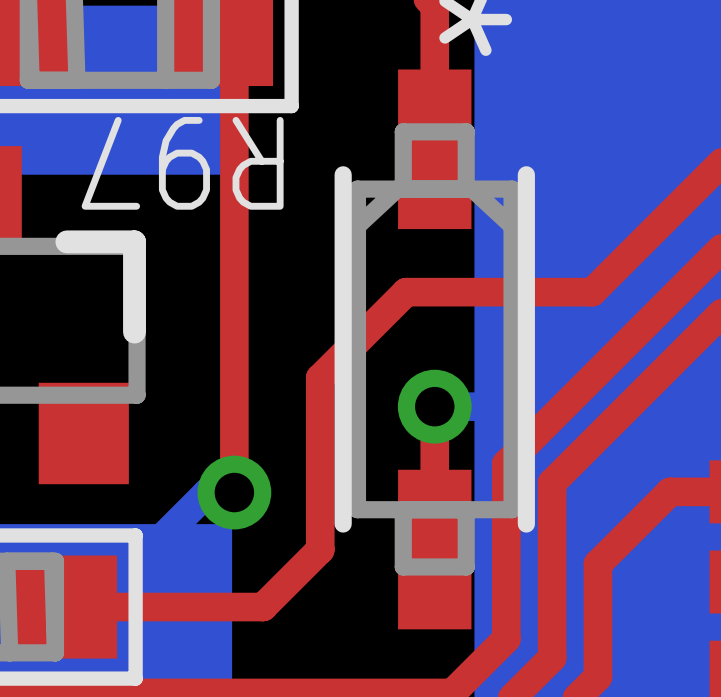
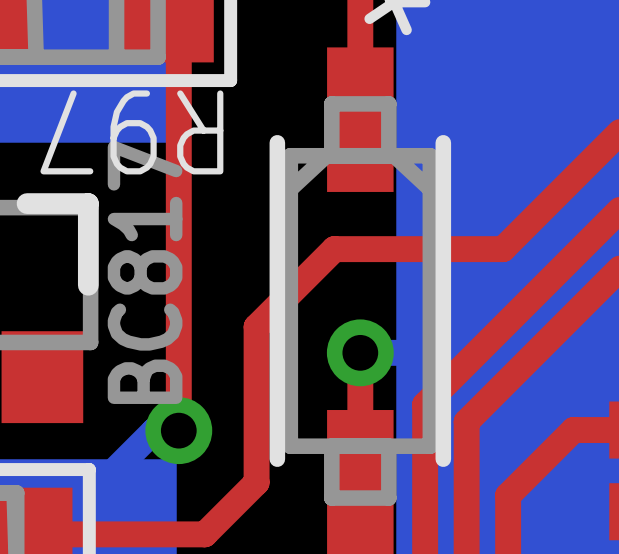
part value: none -> BC817 (145, 272)

